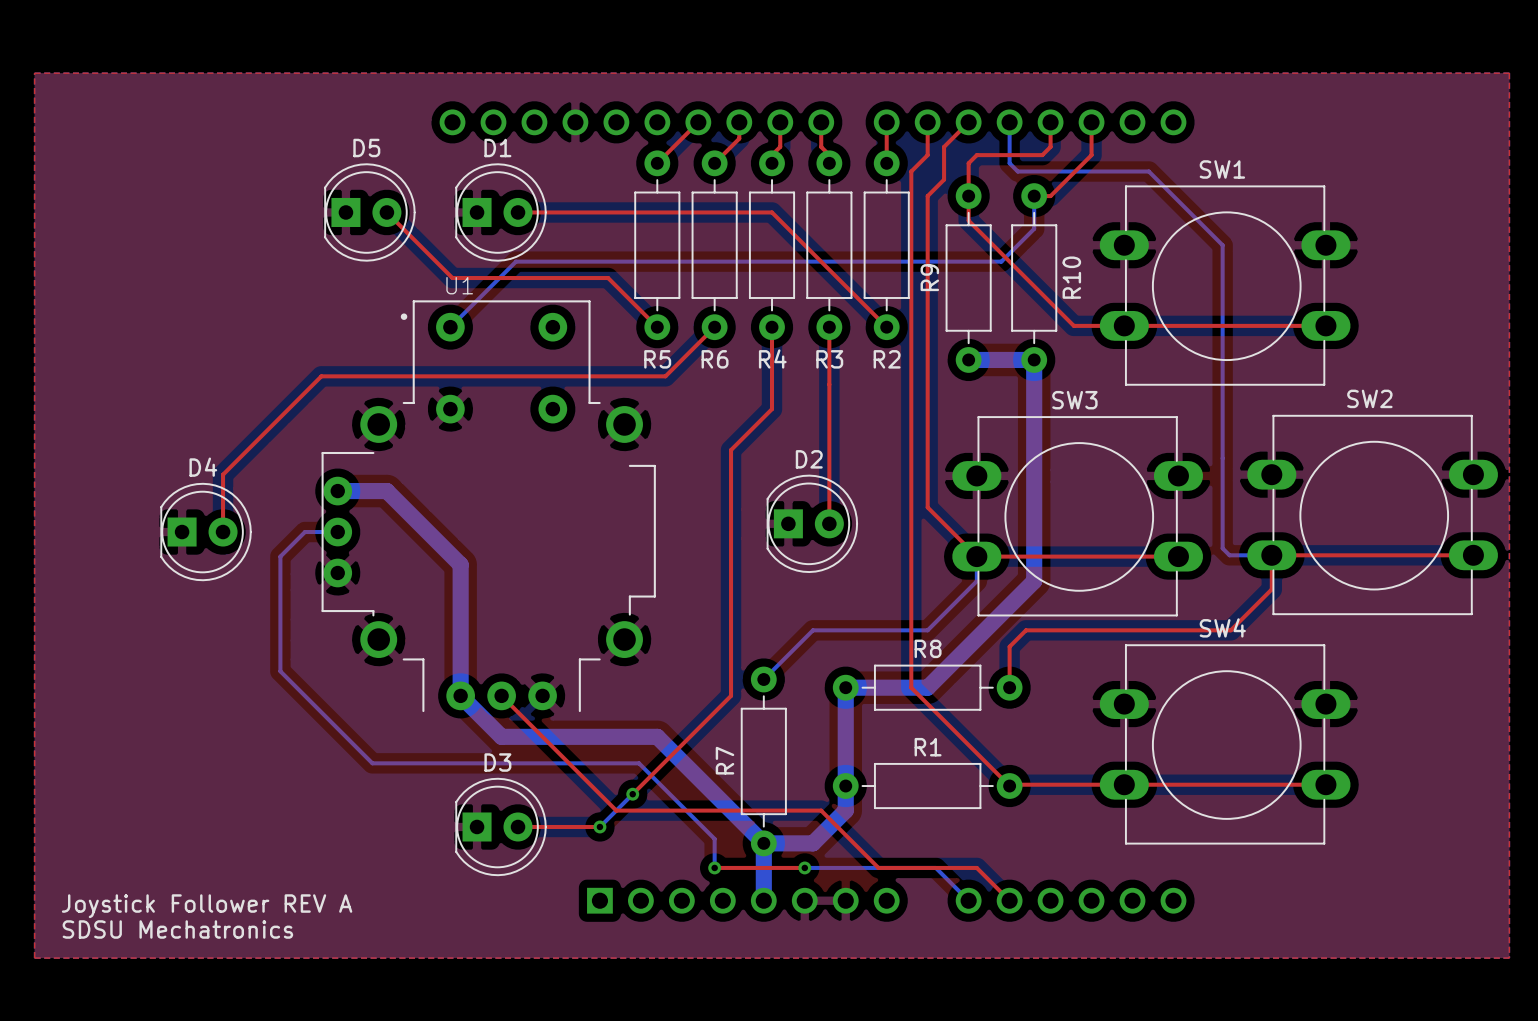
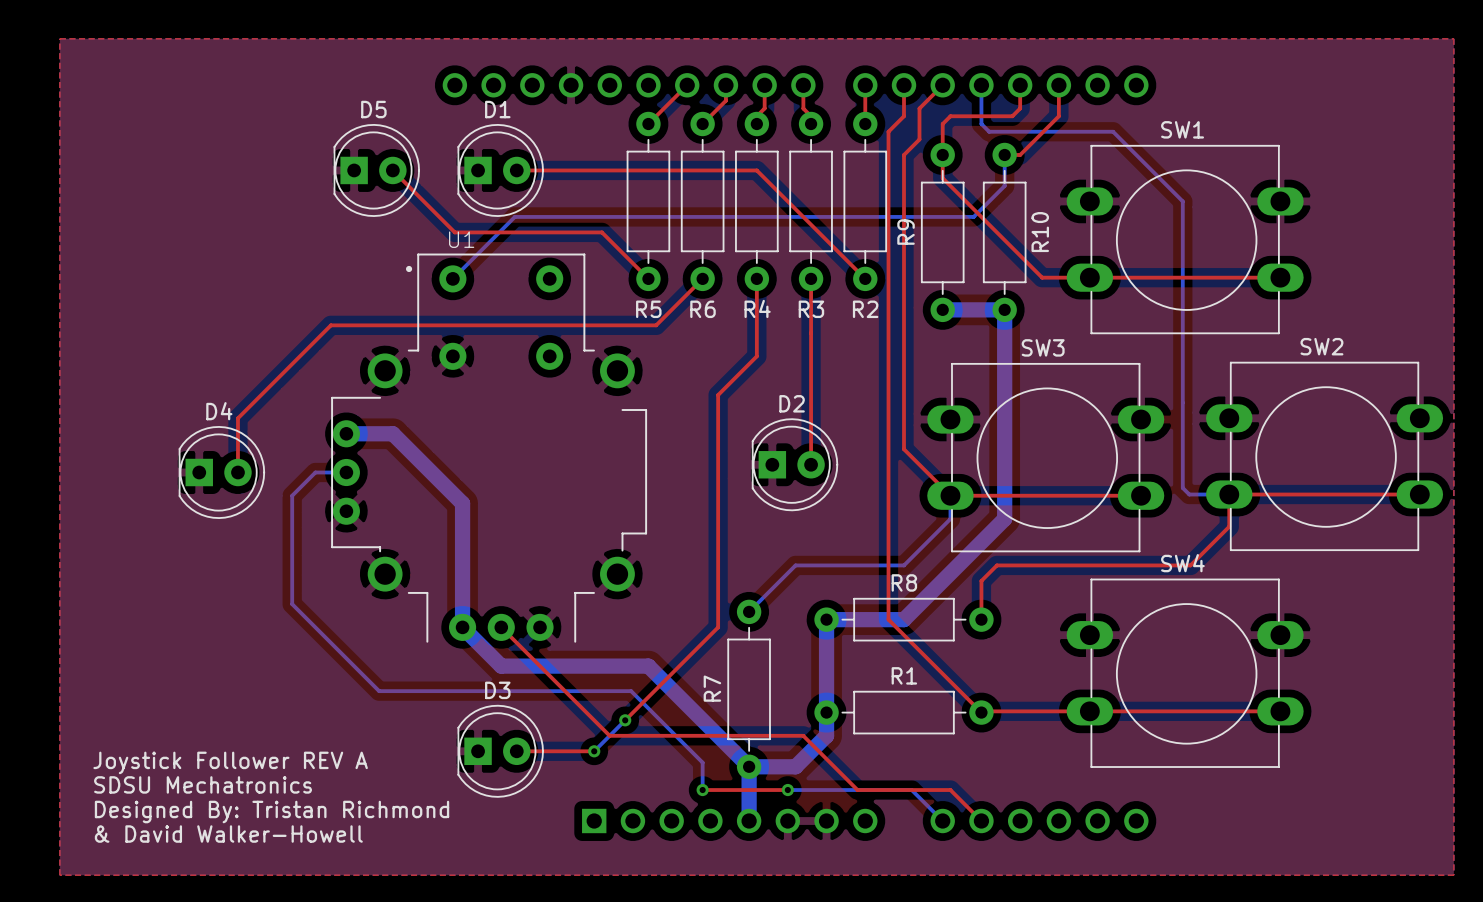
text: none -> Designed By: Tristan Richmond (272, 812)
text position: Joystick Follower REV A (207, 906) -> Joystick Follower REV A (230, 762)
text: none -> & David Walker-Howell (228, 834)
text position: SDSU Mechatronics (177, 929) -> SDSU Mechatronics (203, 784)

